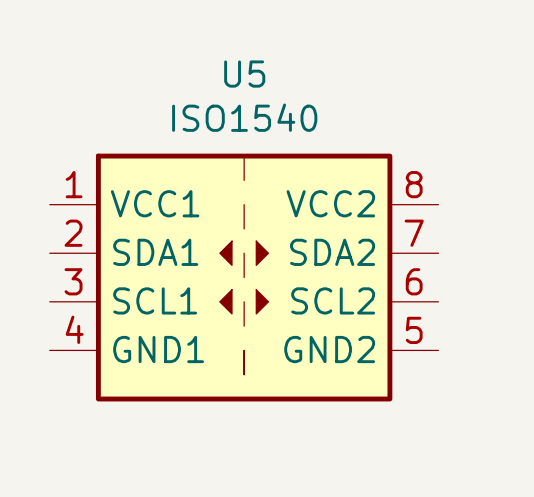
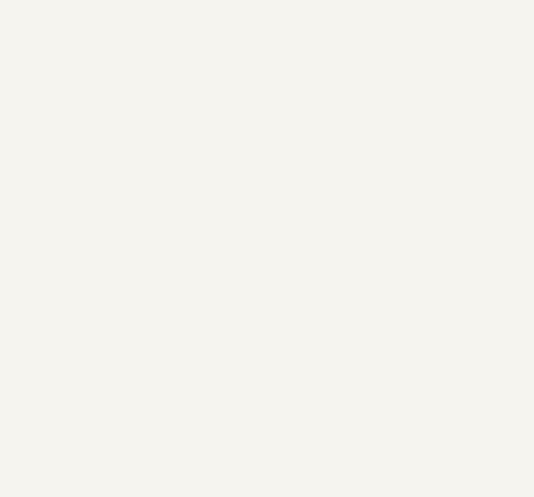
U5: ISO1540 (244, 277) -> none

